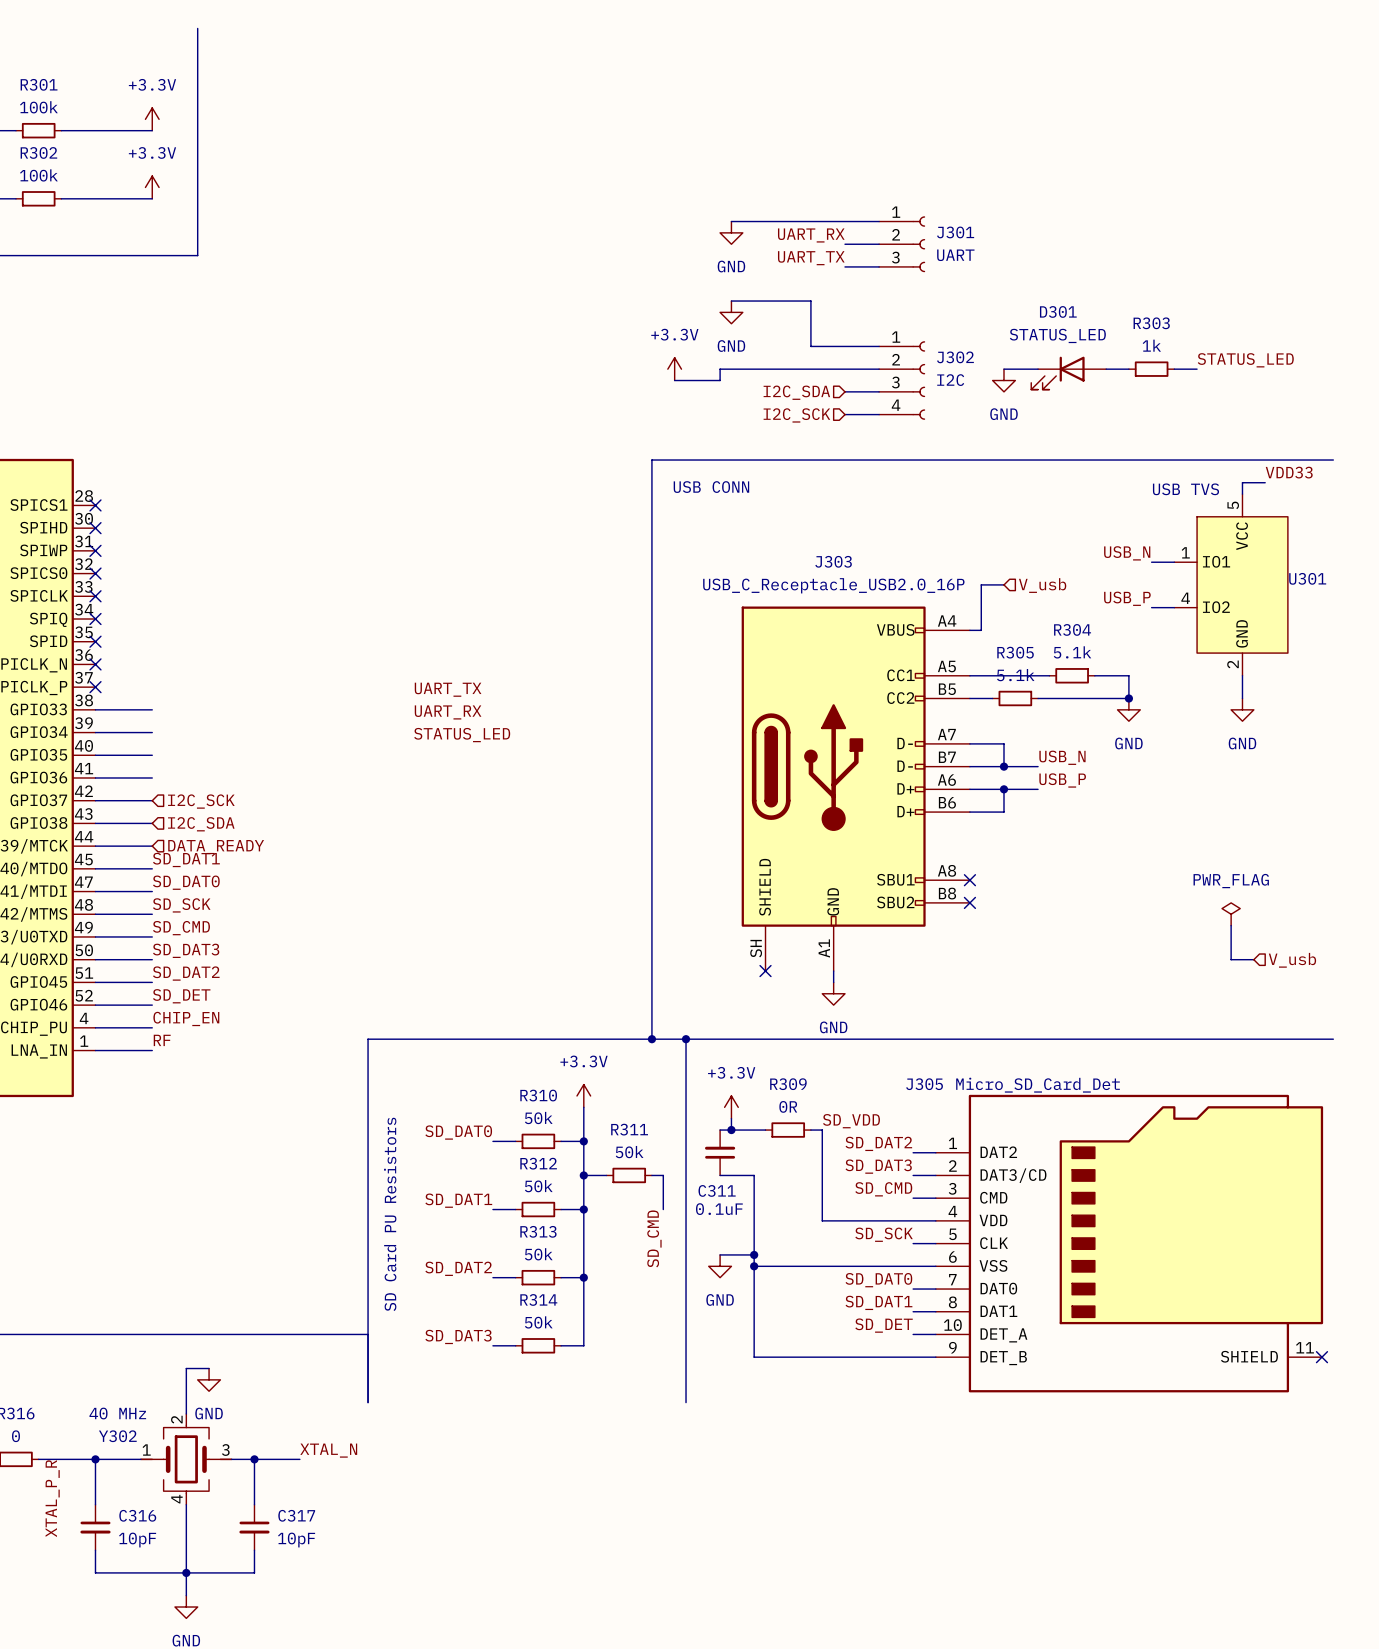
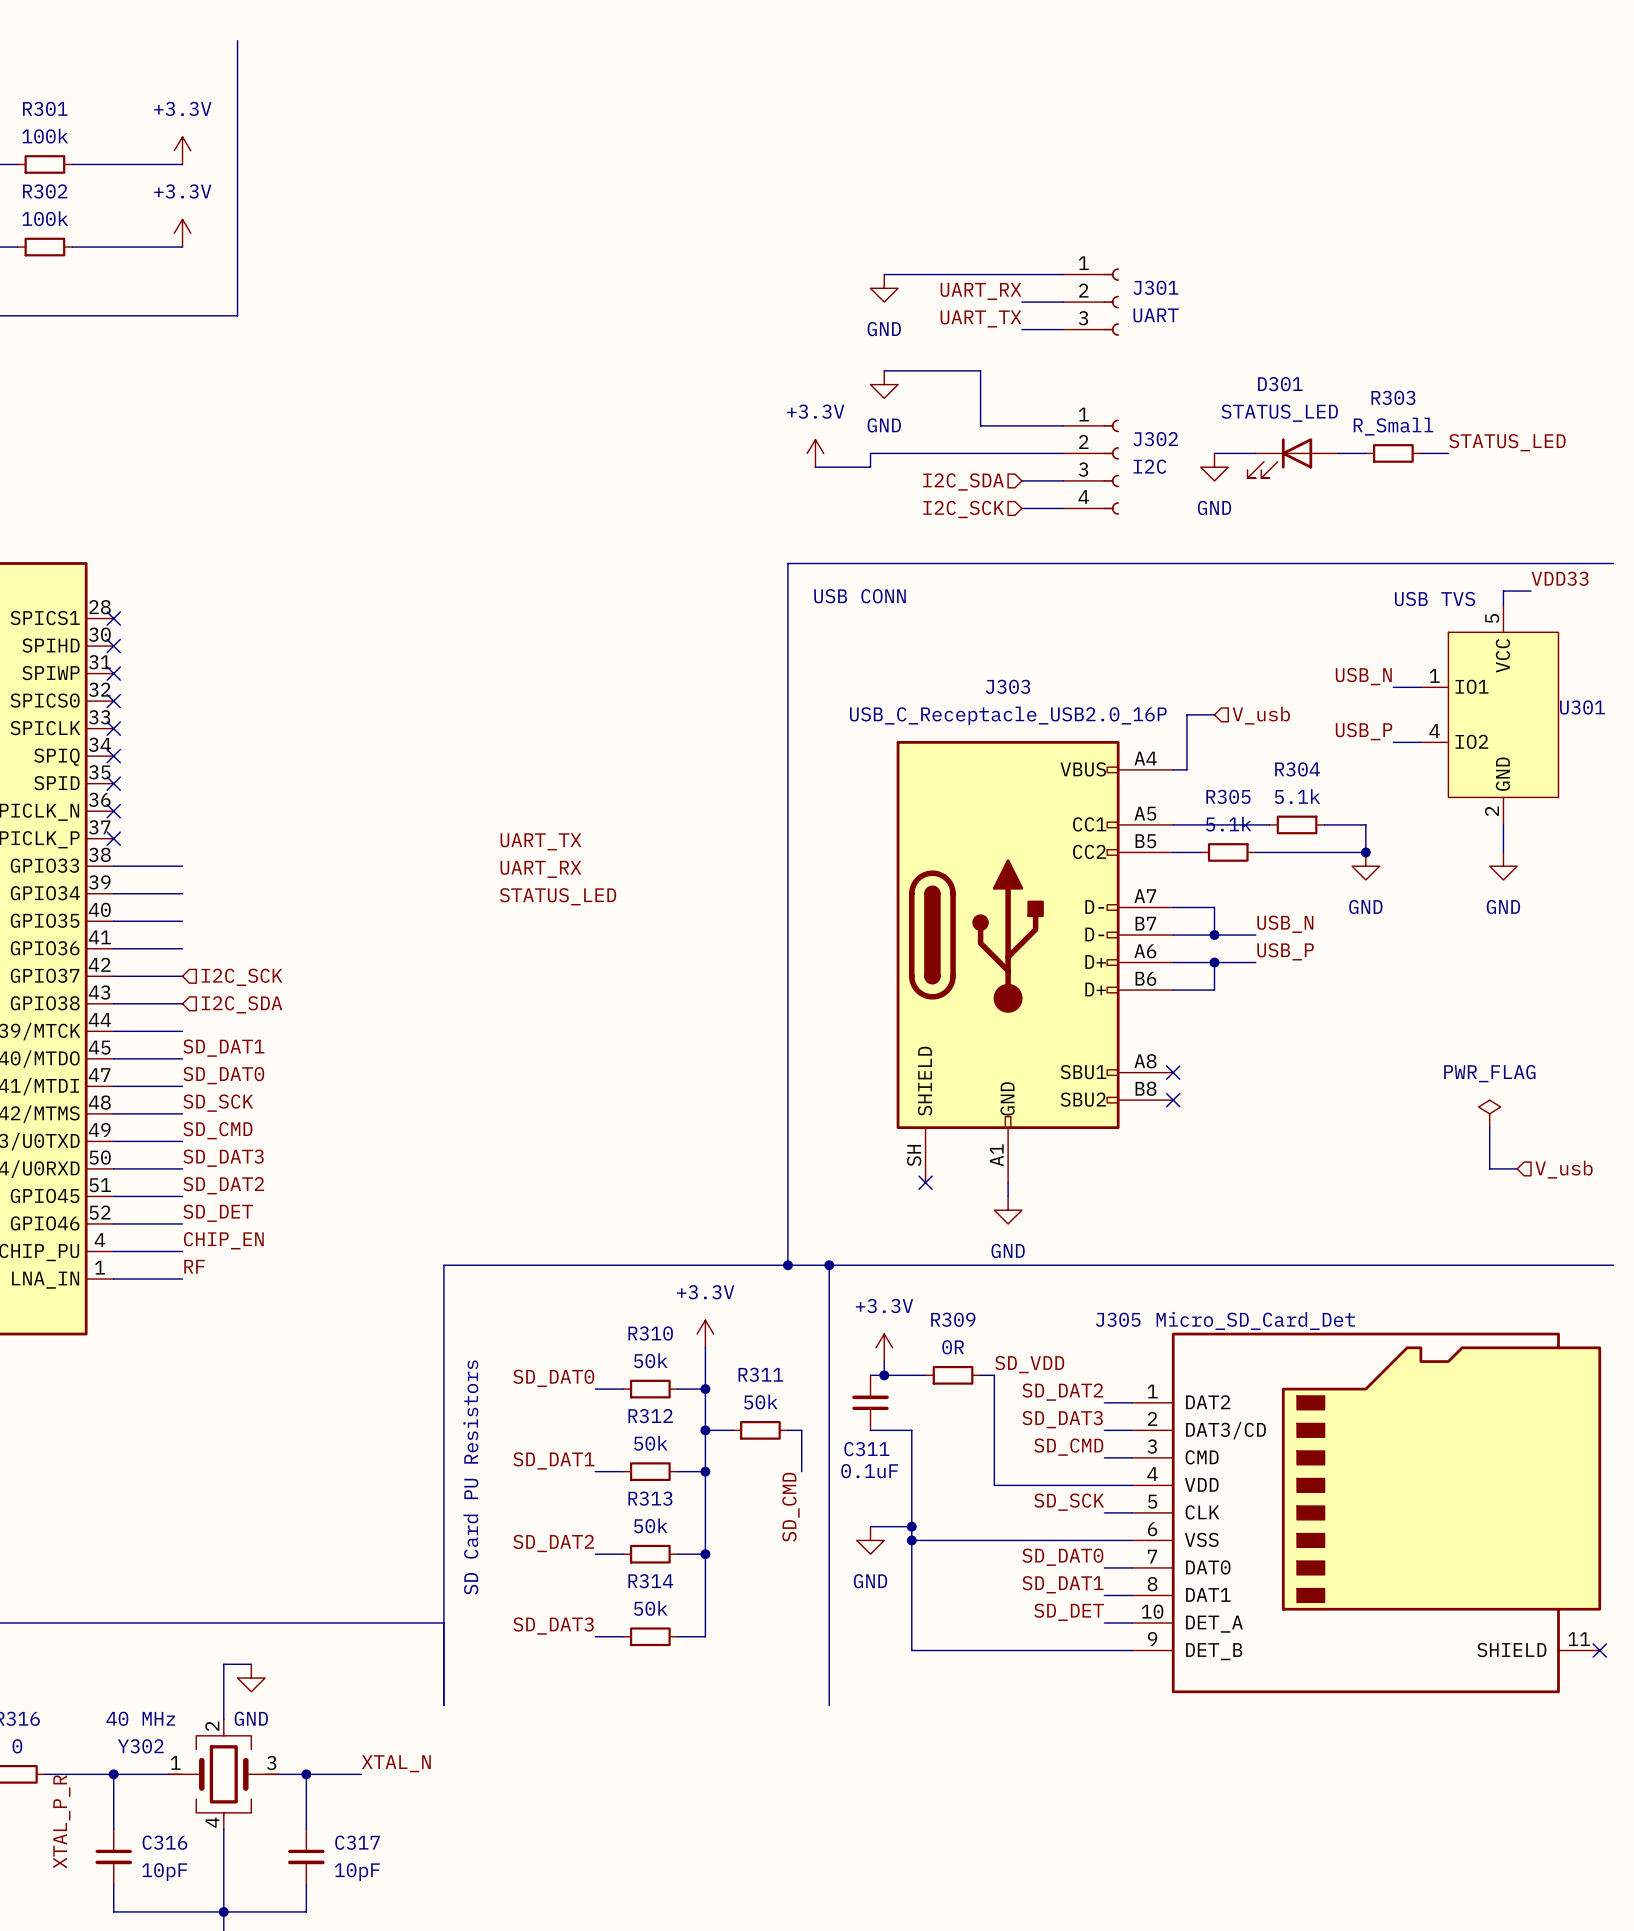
R303 value: 1k (1151, 345) -> R_Small (1393, 426)
hierarchical label: DATA_READY (216, 847) -> none

